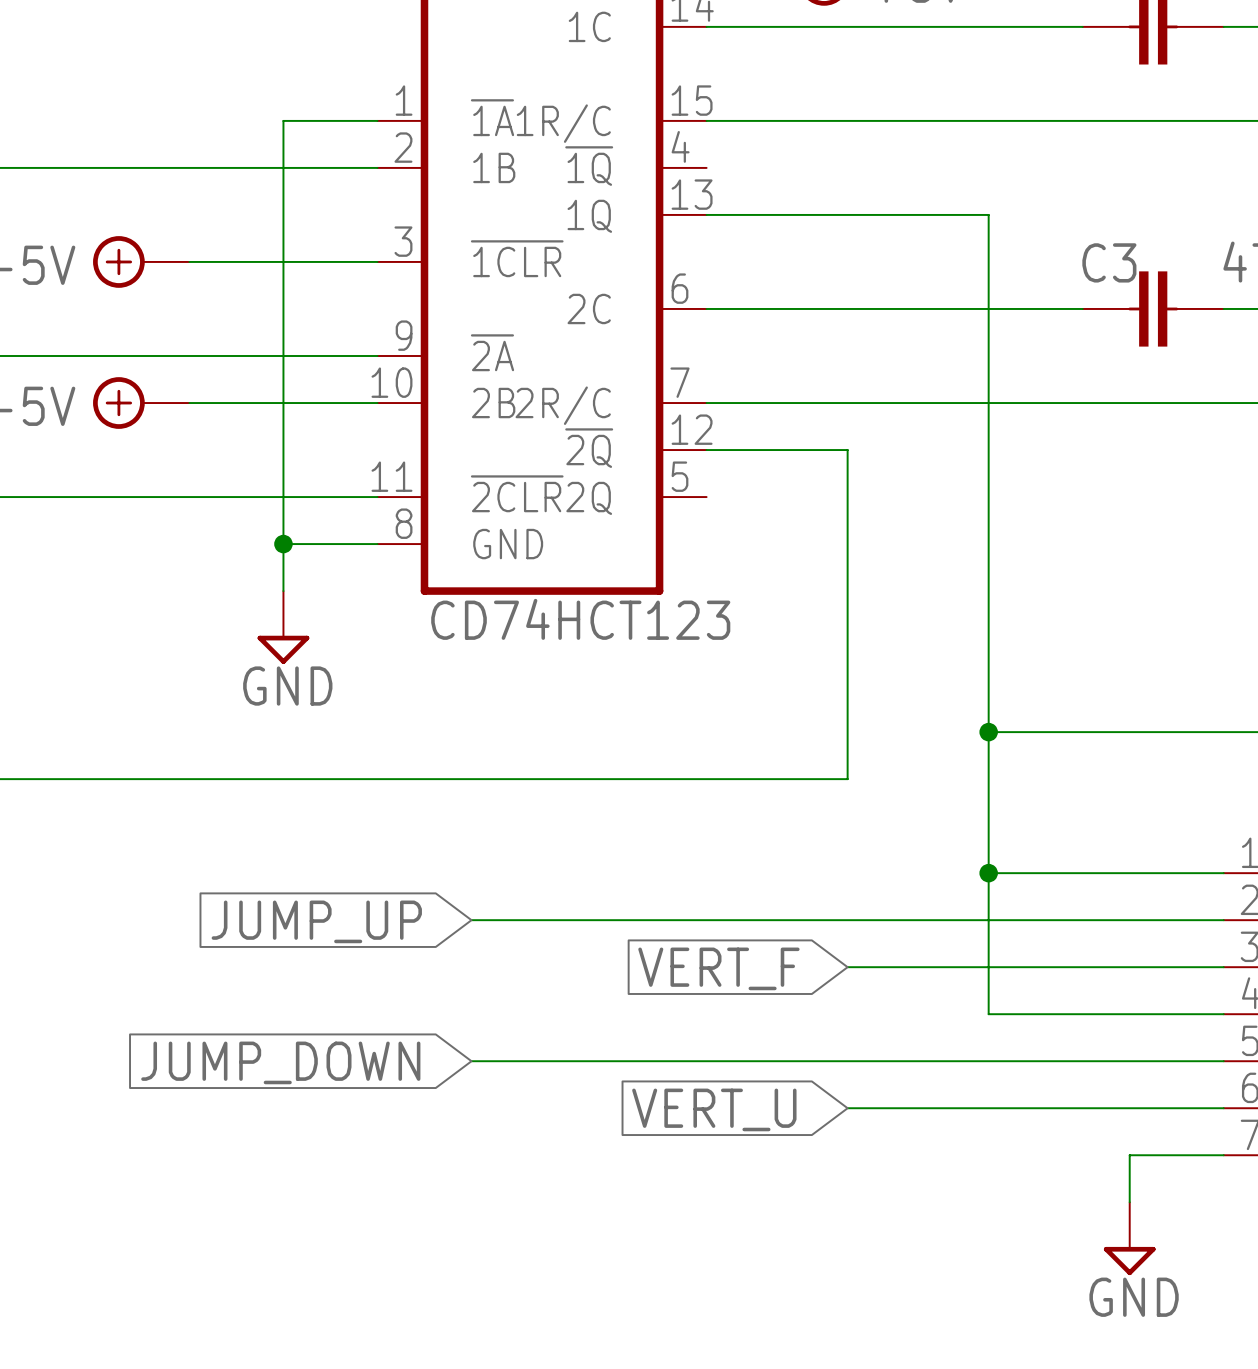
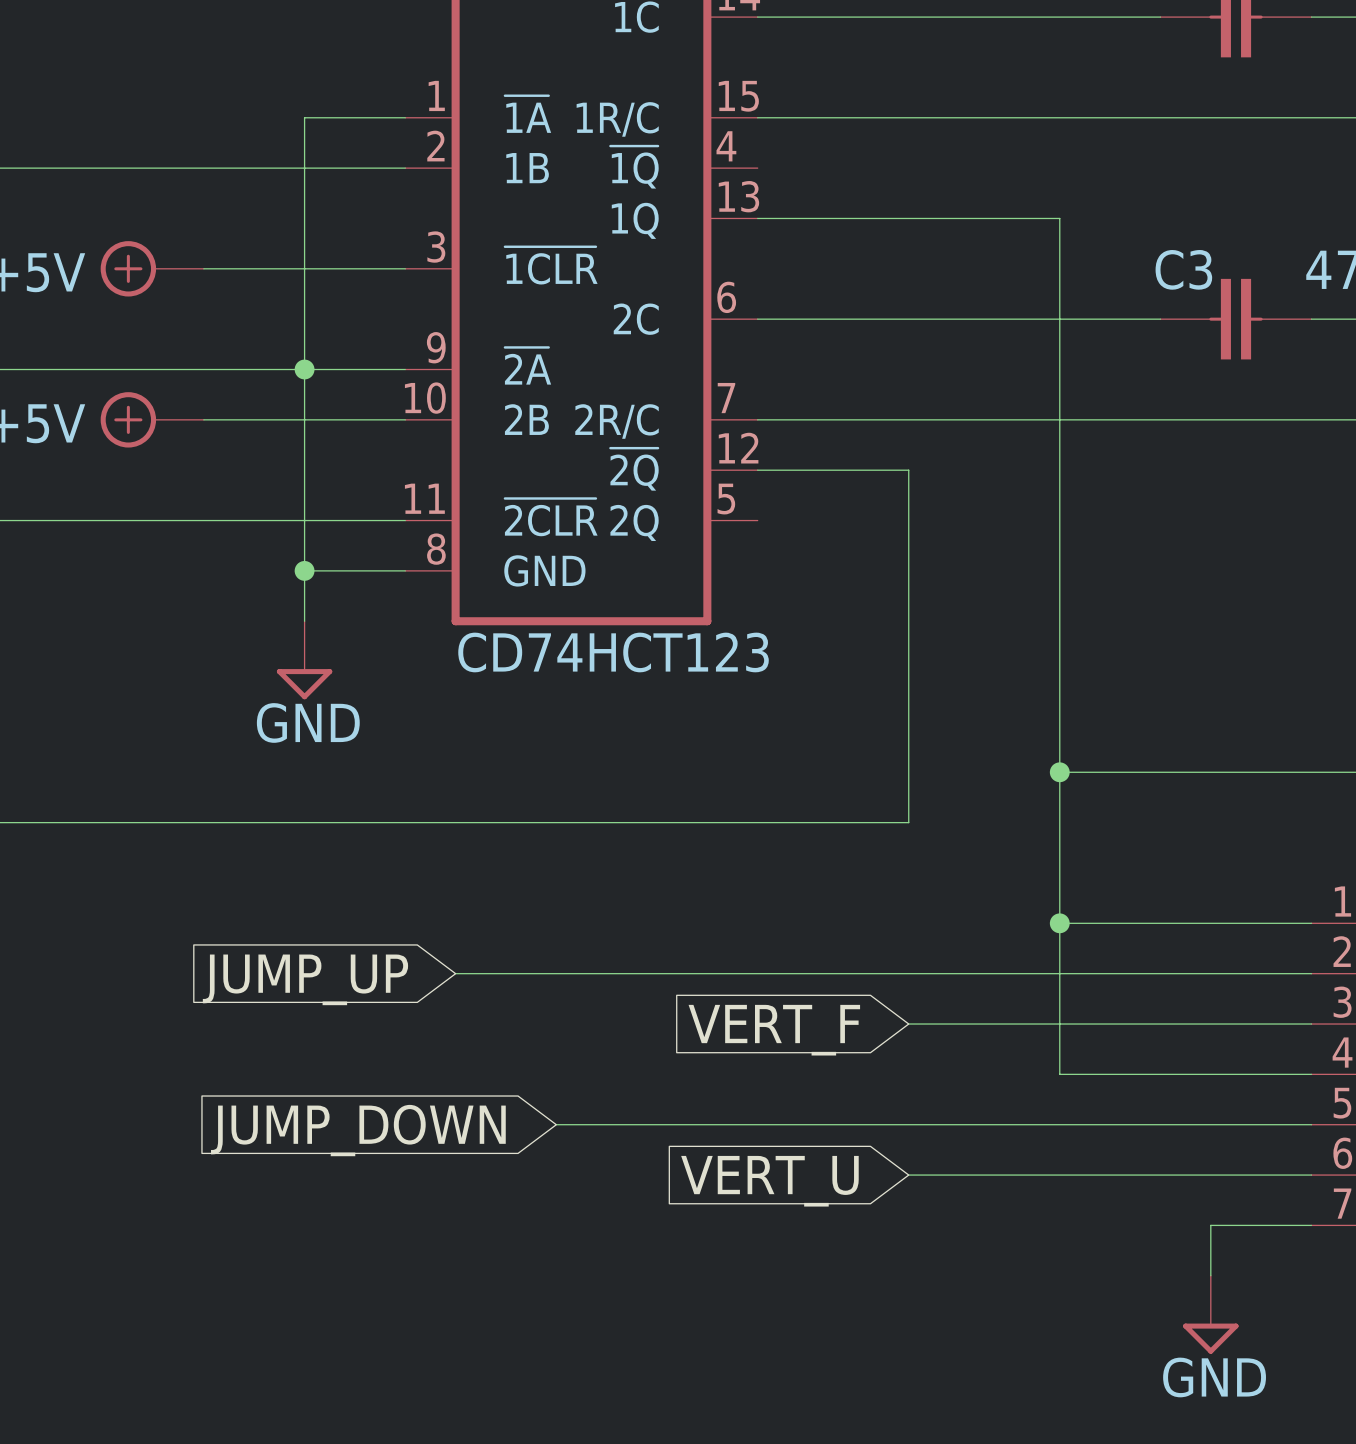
junction: none -> (304, 369)
global label position: JUMP_UP (316, 921) -> JUMP_UP (305, 979)
wire: (471, 1061) (518, 1061) -> (455, 973) (505, 973)
global label position: JUMP_DOWN (280, 1062) -> JUMP_DOWN (358, 1130)

